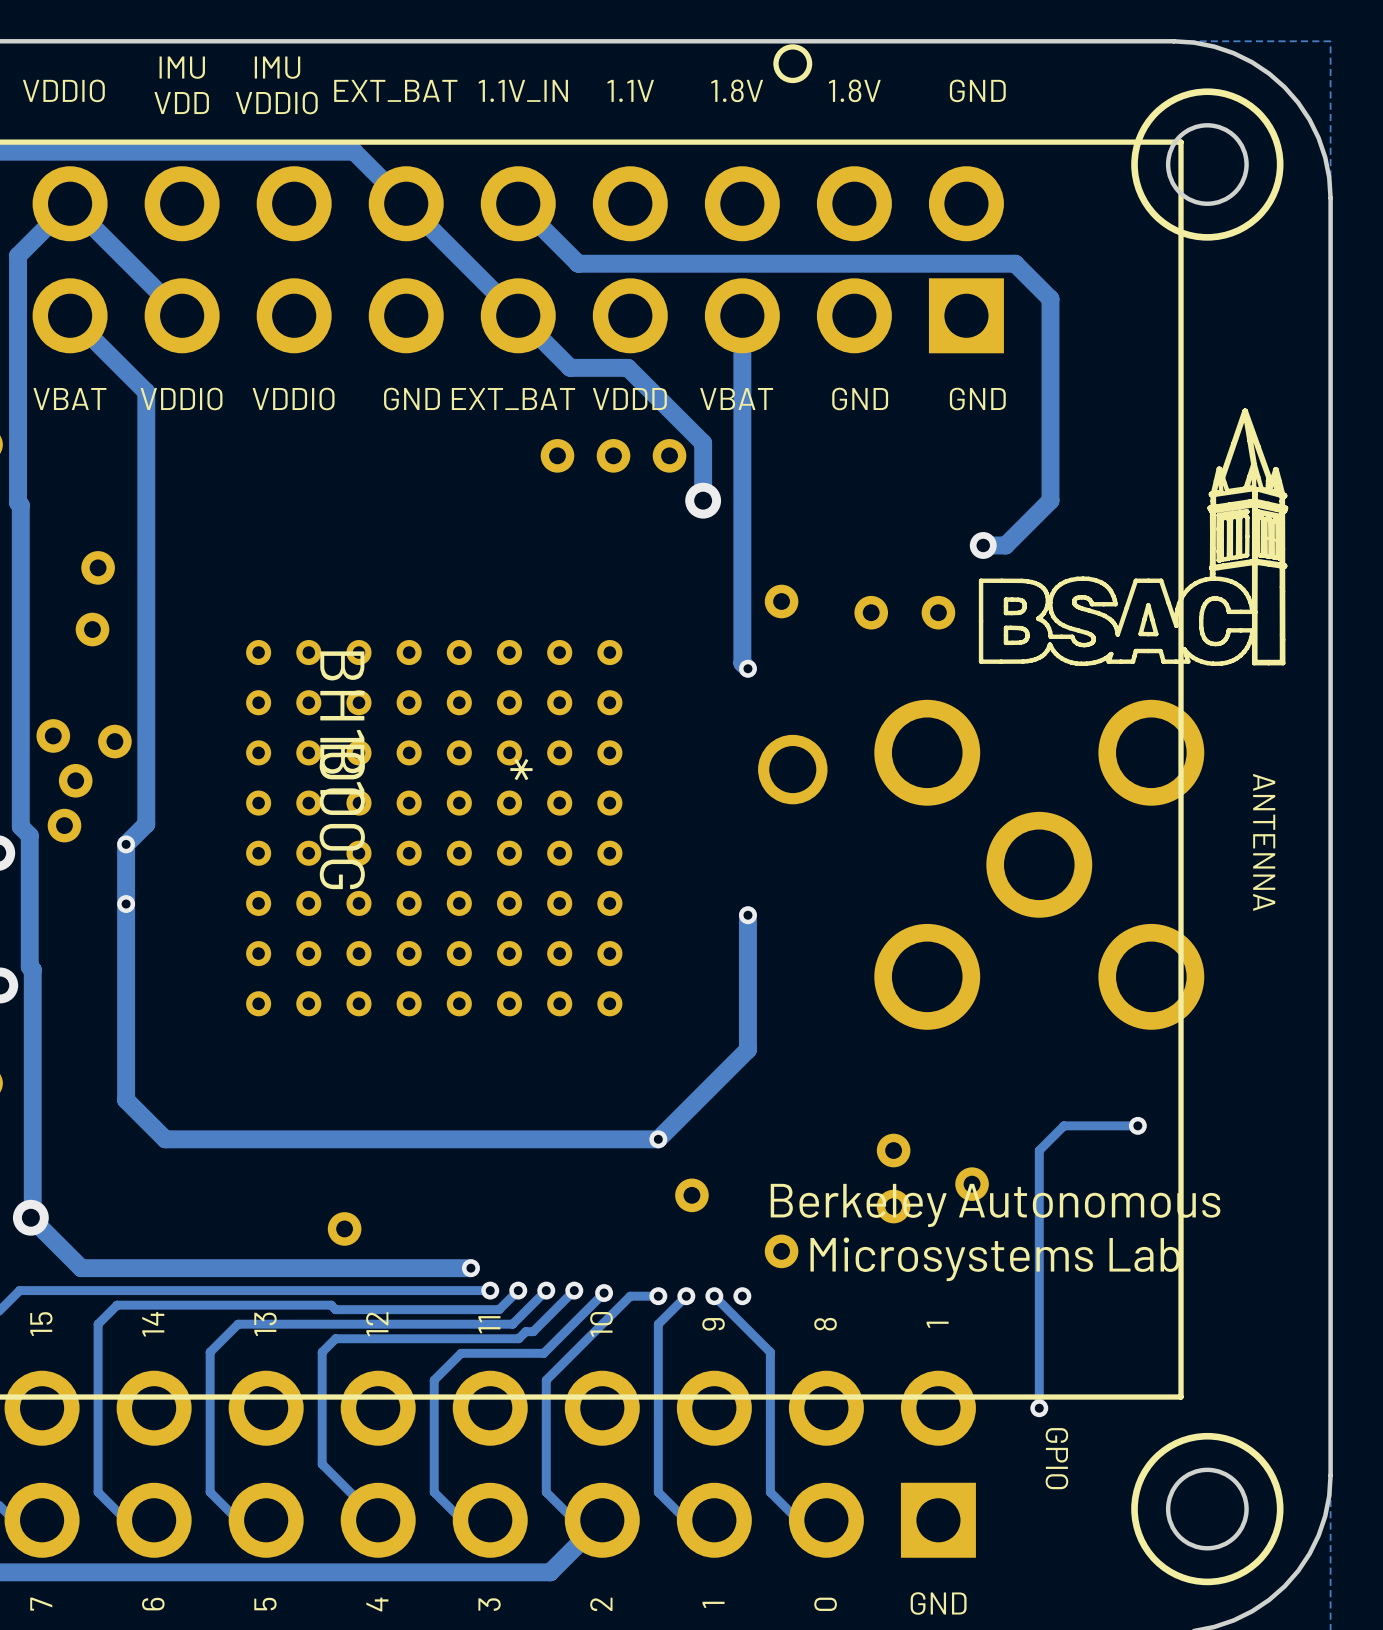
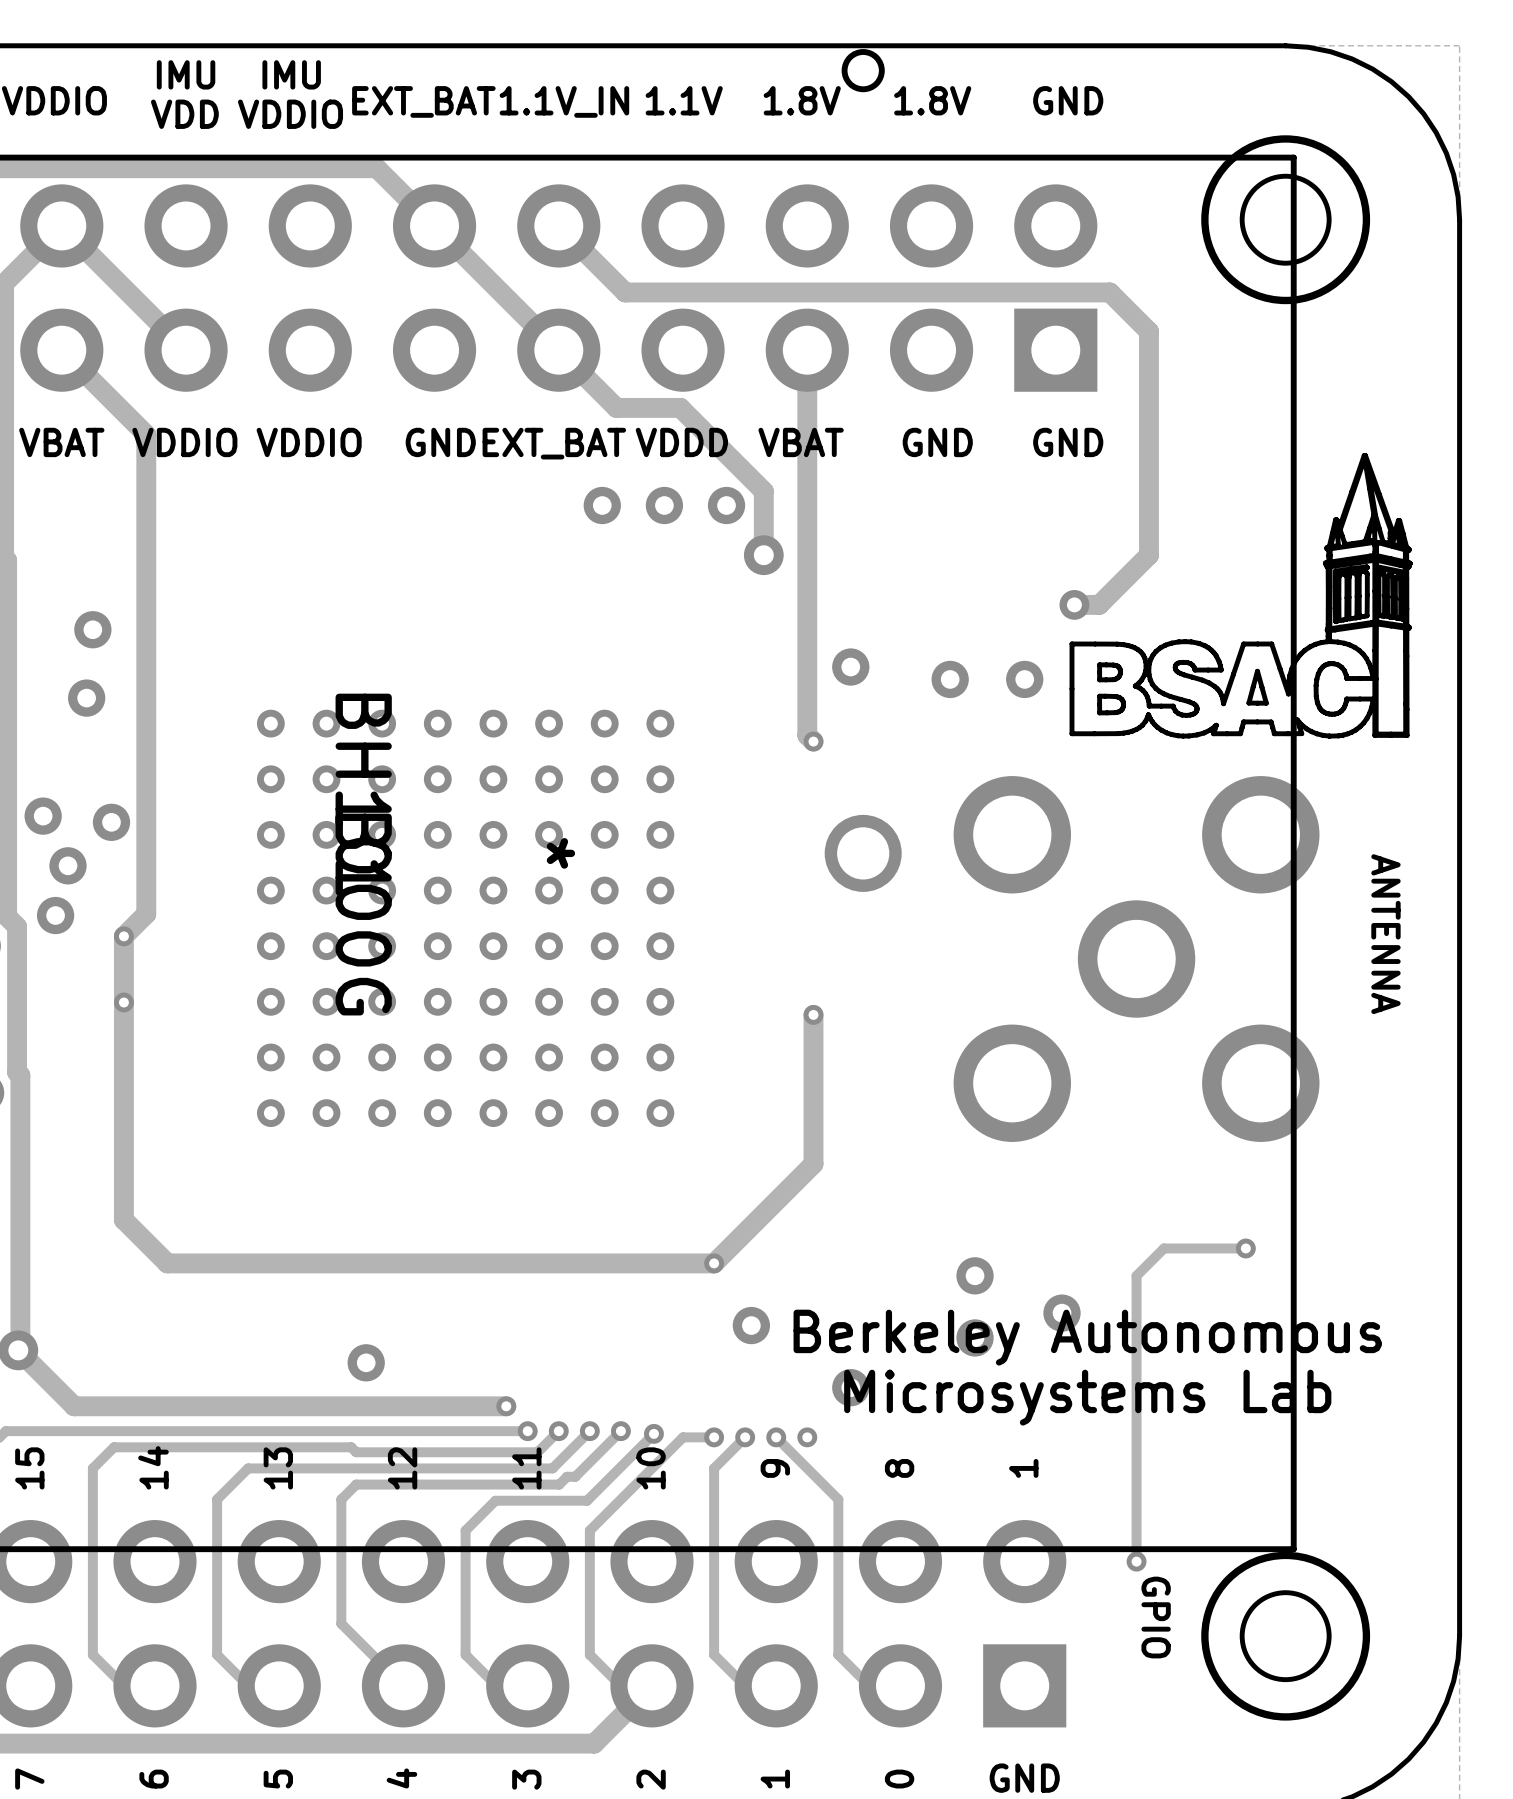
round board edge position: (1207, 164) -> (1285, 219)
drawing position: (1207, 164) -> (1285, 219)
round board edge position: (1207, 1509) -> (1285, 1636)
drawing position: (1207, 1509) -> (1285, 1636)

